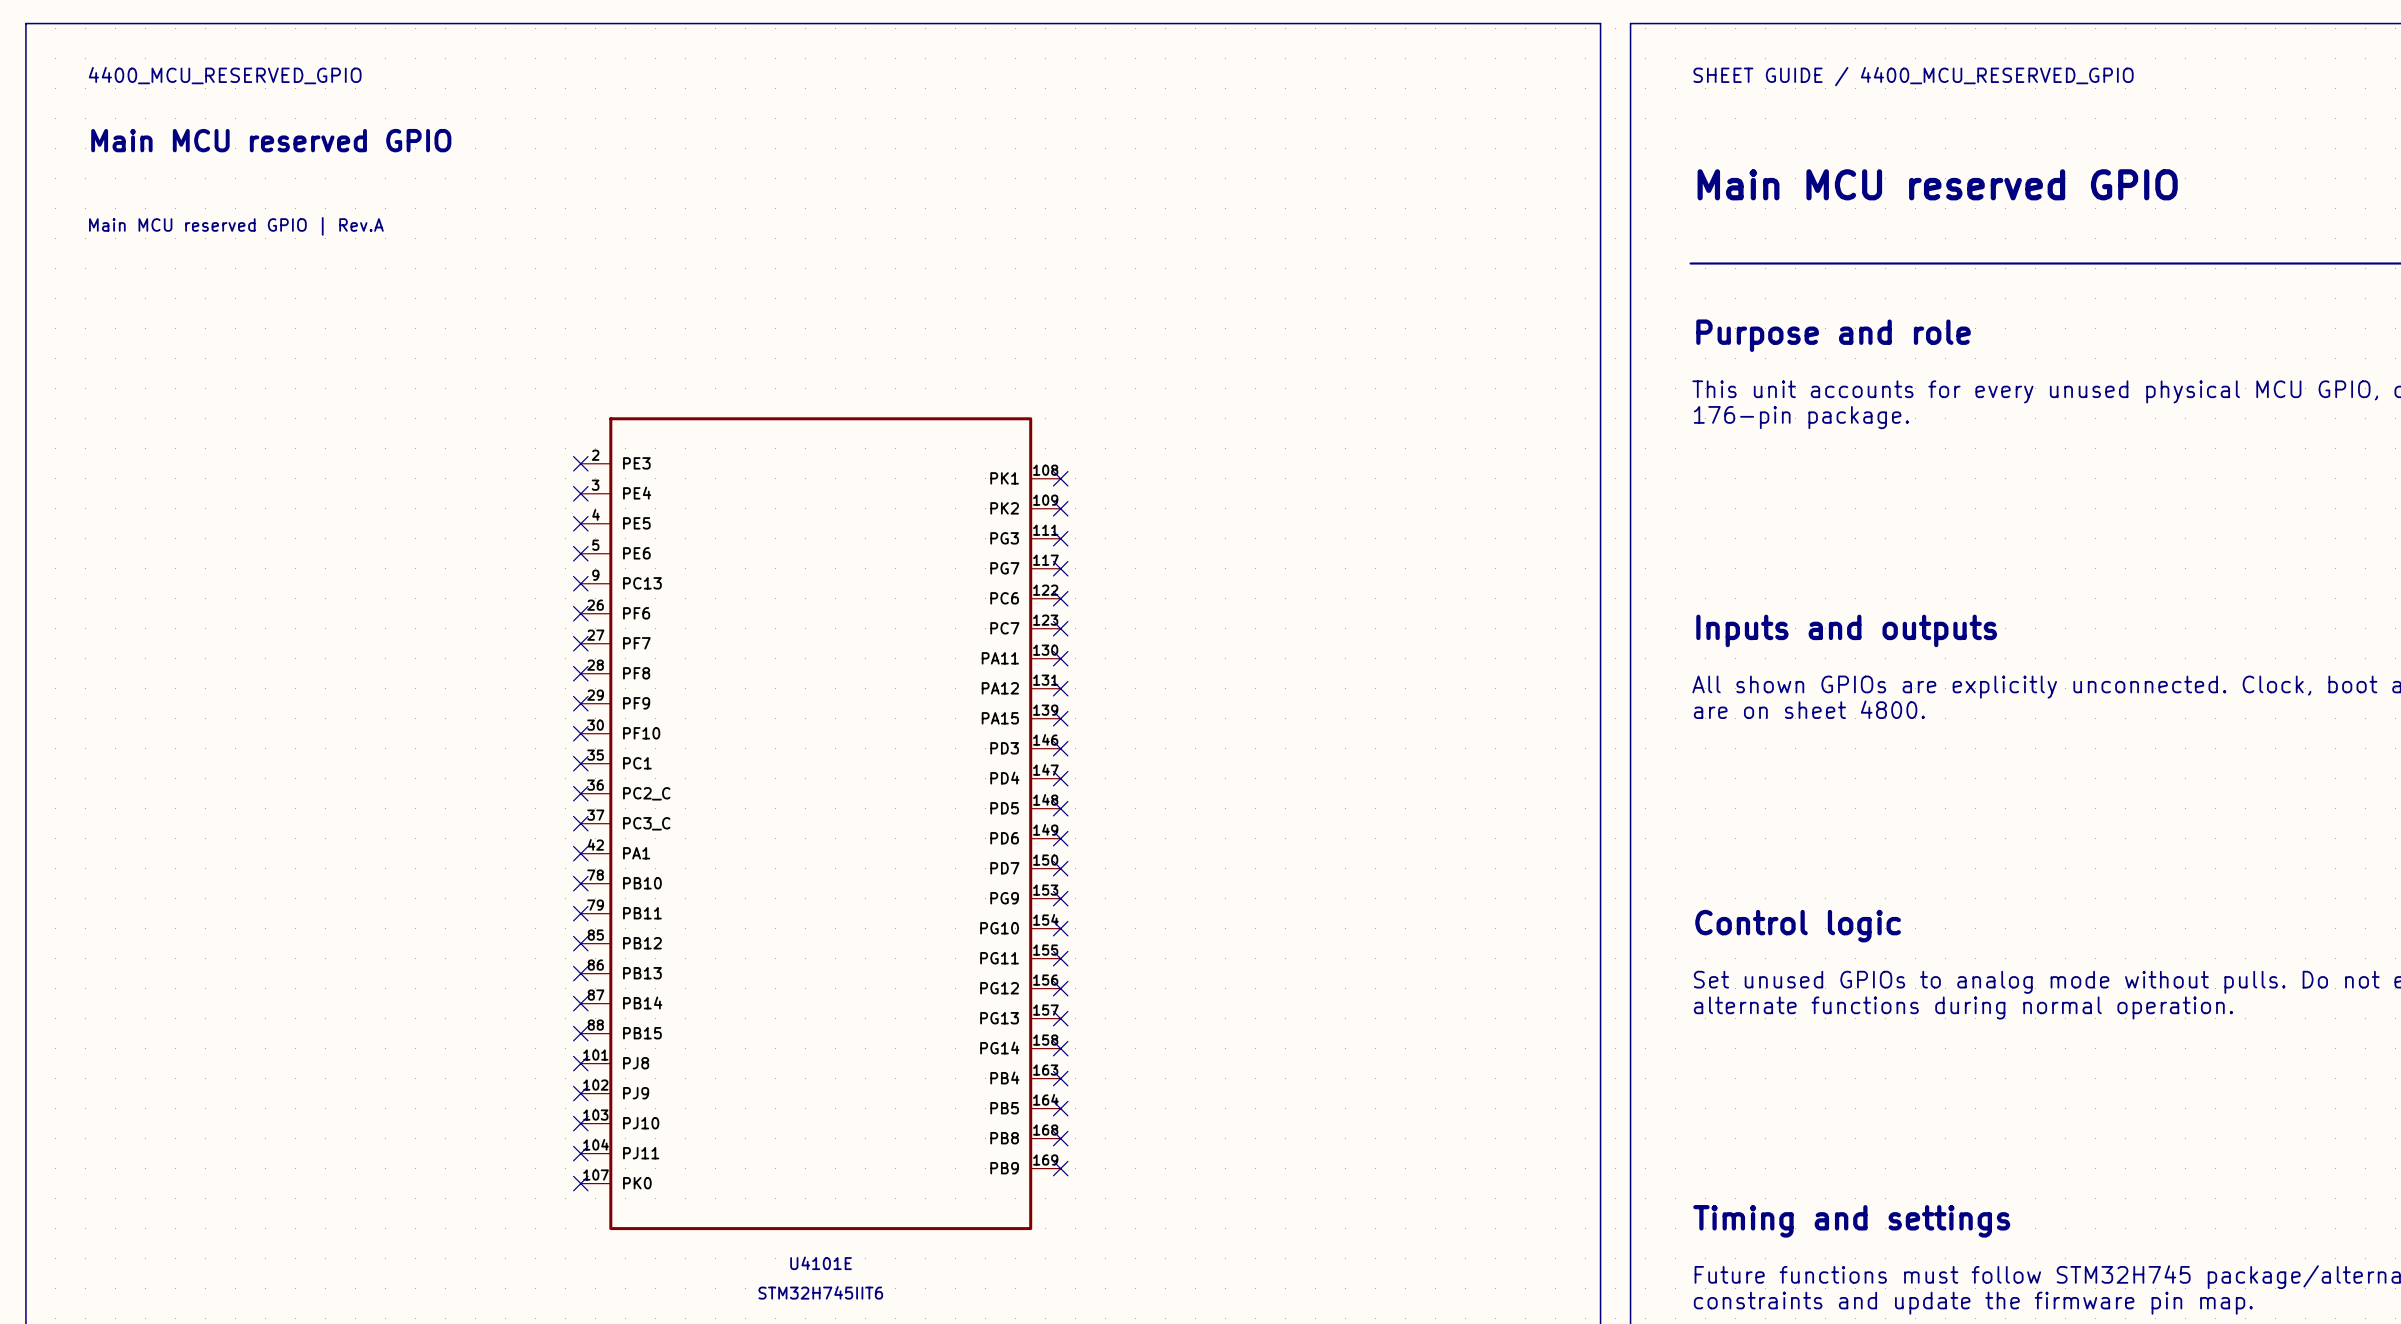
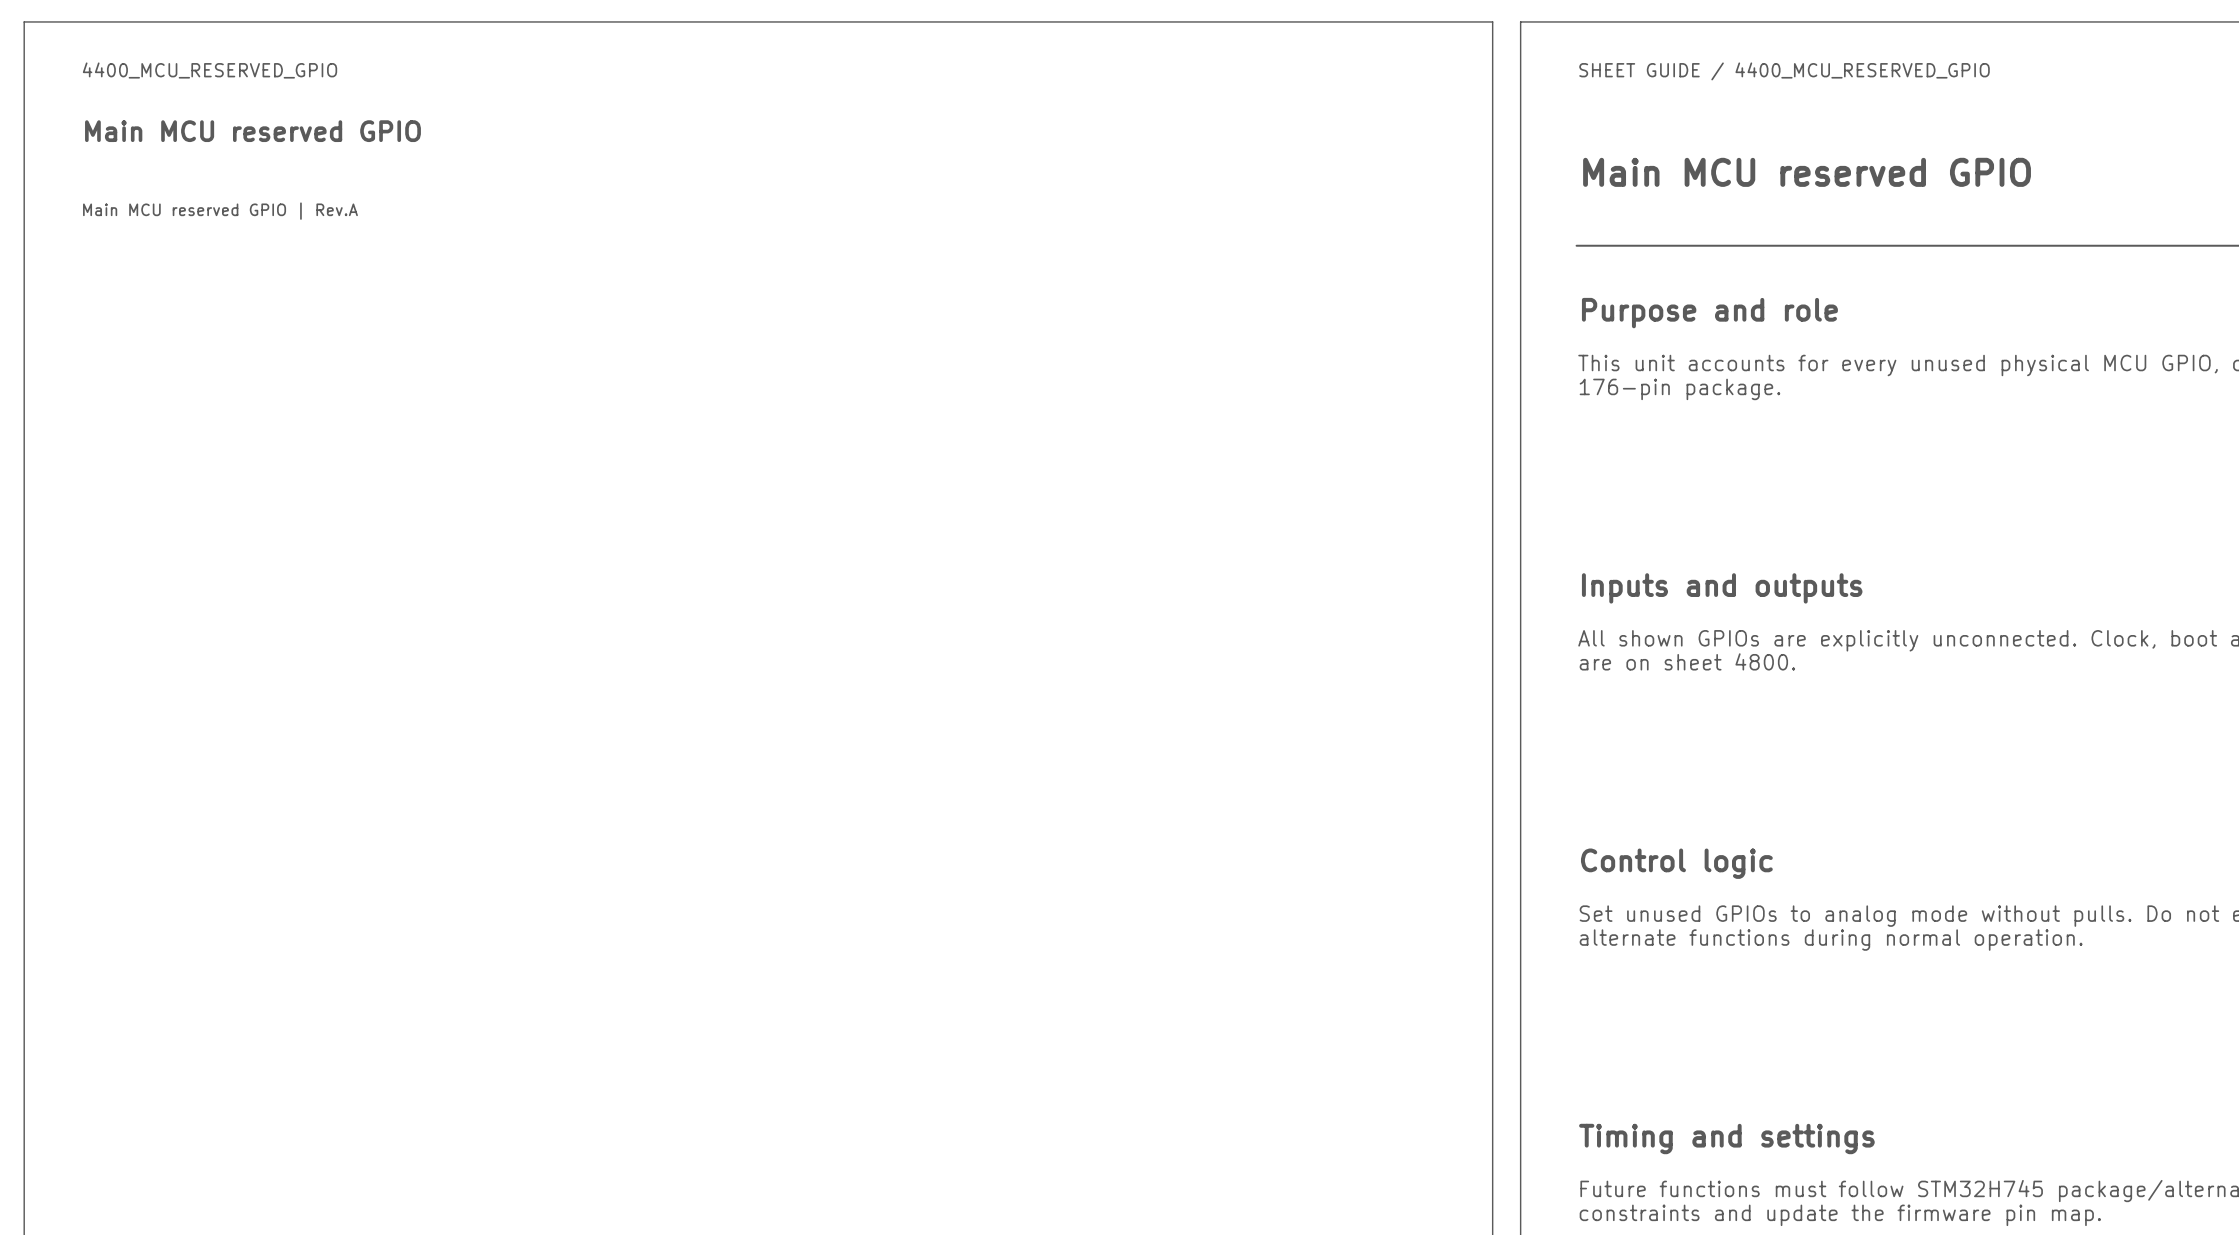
no-connect mark: (580, 463) -> none
no-connect mark: (1060, 478) -> none
no-connect mark: (580, 493) -> none
no-connect mark: (1060, 508) -> none
no-connect mark: (580, 523) -> none
no-connect mark: (1060, 538) -> none
no-connect mark: (580, 553) -> none
no-connect mark: (1060, 568) -> none
no-connect mark: (580, 583) -> none
no-connect mark: (1060, 598) -> none
no-connect mark: (580, 613) -> none
no-connect mark: (1060, 628) -> none
no-connect mark: (580, 643) -> none
no-connect mark: (1060, 658) -> none
no-connect mark: (580, 673) -> none
no-connect mark: (1060, 688) -> none
no-connect mark: (580, 703) -> none
no-connect mark: (1060, 718) -> none
no-connect mark: (580, 733) -> none
no-connect mark: (1060, 748) -> none
no-connect mark: (580, 763) -> none
no-connect mark: (1060, 778) -> none
no-connect mark: (580, 793) -> none
no-connect mark: (1060, 808) -> none
no-connect mark: (580, 823) -> none
U4101E: STM32H745IIT6 (820, 823) -> none
no-connect mark: (1060, 838) -> none
no-connect mark: (580, 853) -> none
no-connect mark: (1060, 868) -> none
no-connect mark: (580, 883) -> none
no-connect mark: (1060, 898) -> none
no-connect mark: (580, 913) -> none
no-connect mark: (1060, 928) -> none
no-connect mark: (580, 943) -> none
no-connect mark: (1060, 958) -> none
no-connect mark: (580, 973) -> none
no-connect mark: (1060, 988) -> none
no-connect mark: (580, 1003) -> none
no-connect mark: (1060, 1018) -> none
no-connect mark: (580, 1033) -> none
no-connect mark: (1060, 1048) -> none
no-connect mark: (580, 1063) -> none
no-connect mark: (1060, 1078) -> none
no-connect mark: (580, 1093) -> none
no-connect mark: (1060, 1108) -> none
no-connect mark: (580, 1123) -> none
no-connect mark: (1060, 1138) -> none
no-connect mark: (580, 1153) -> none
no-connect mark: (1060, 1168) -> none
no-connect mark: (580, 1183) -> none

